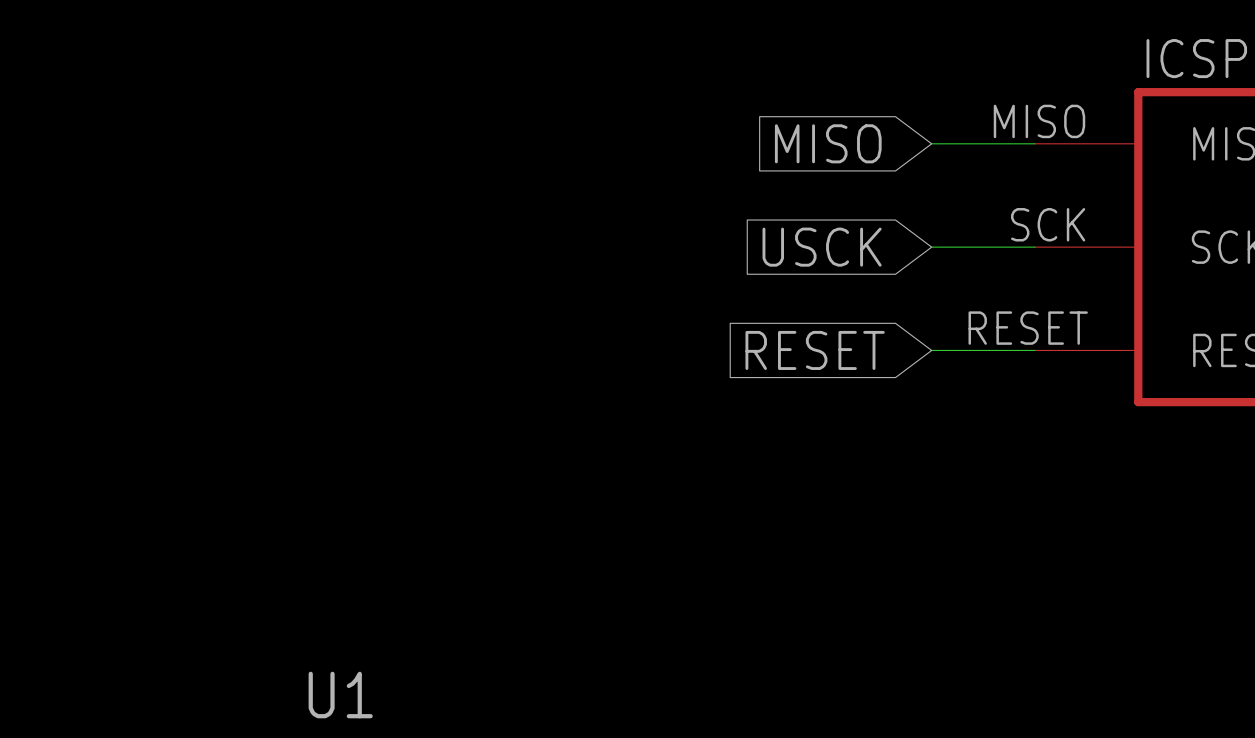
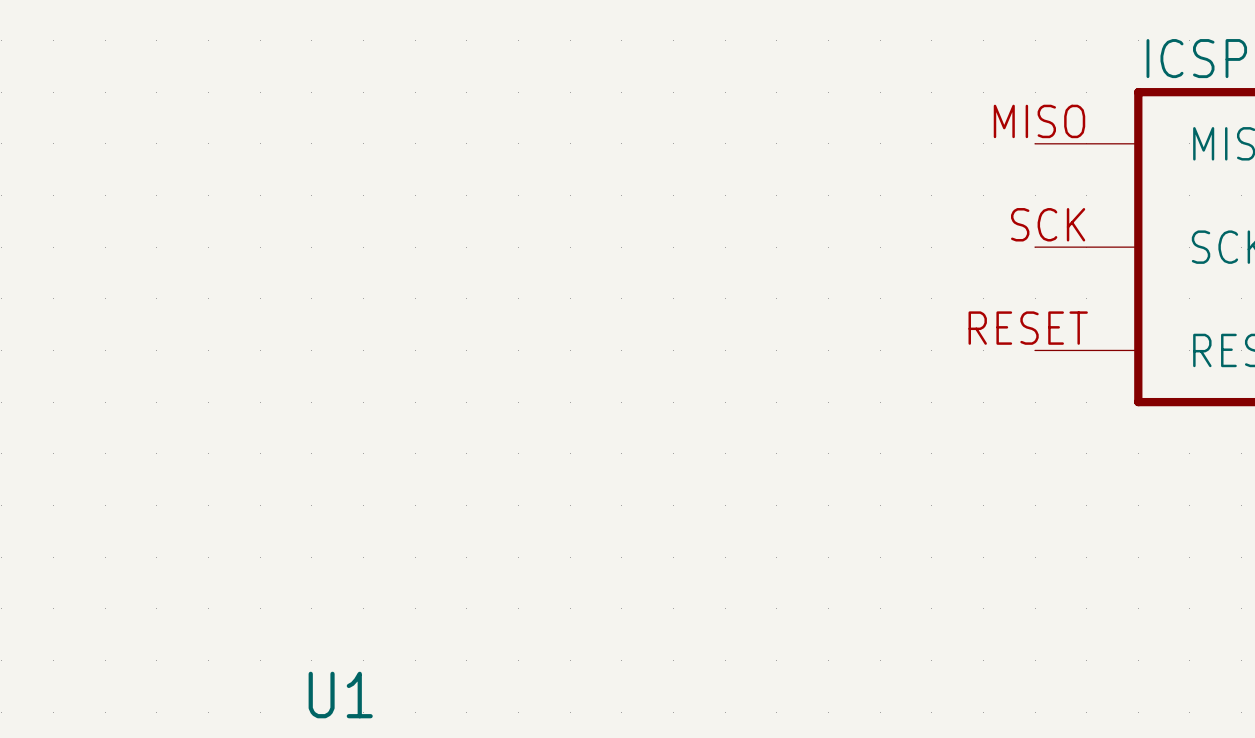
global label: MISO (828, 143) -> none
wire: (931, 143) (1035, 143) -> none
global label: USCK (822, 247) -> none
wire: (931, 247) (1035, 247) -> none
global label: RESET (815, 350) -> none
wire: (931, 350) (1035, 350) -> none

